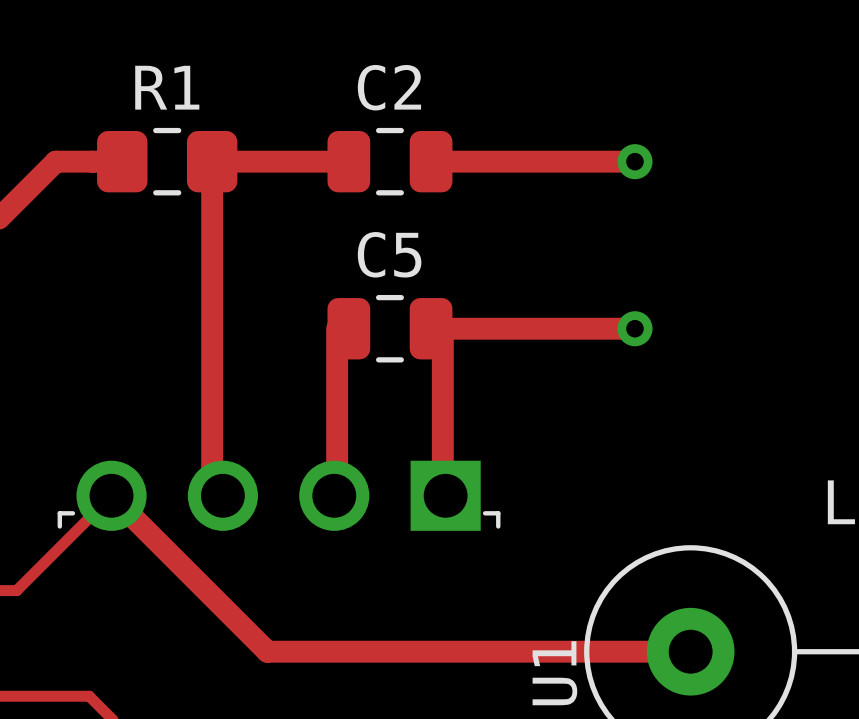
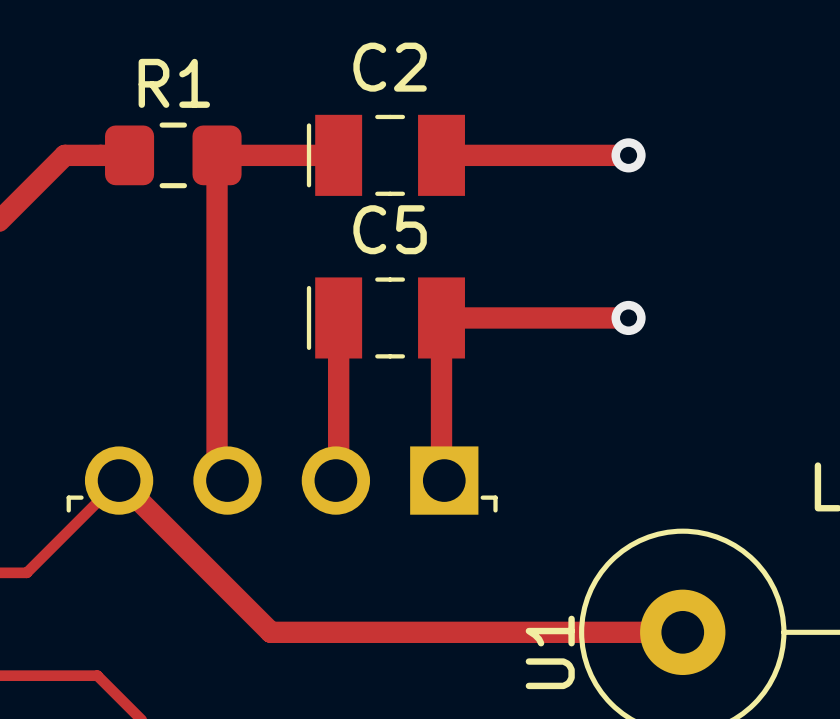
C2 footprint: [327, 127, 453, 196] -> [306, 114, 465, 196]
C5 footprint: [327, 294, 453, 363] -> [306, 277, 465, 359]

